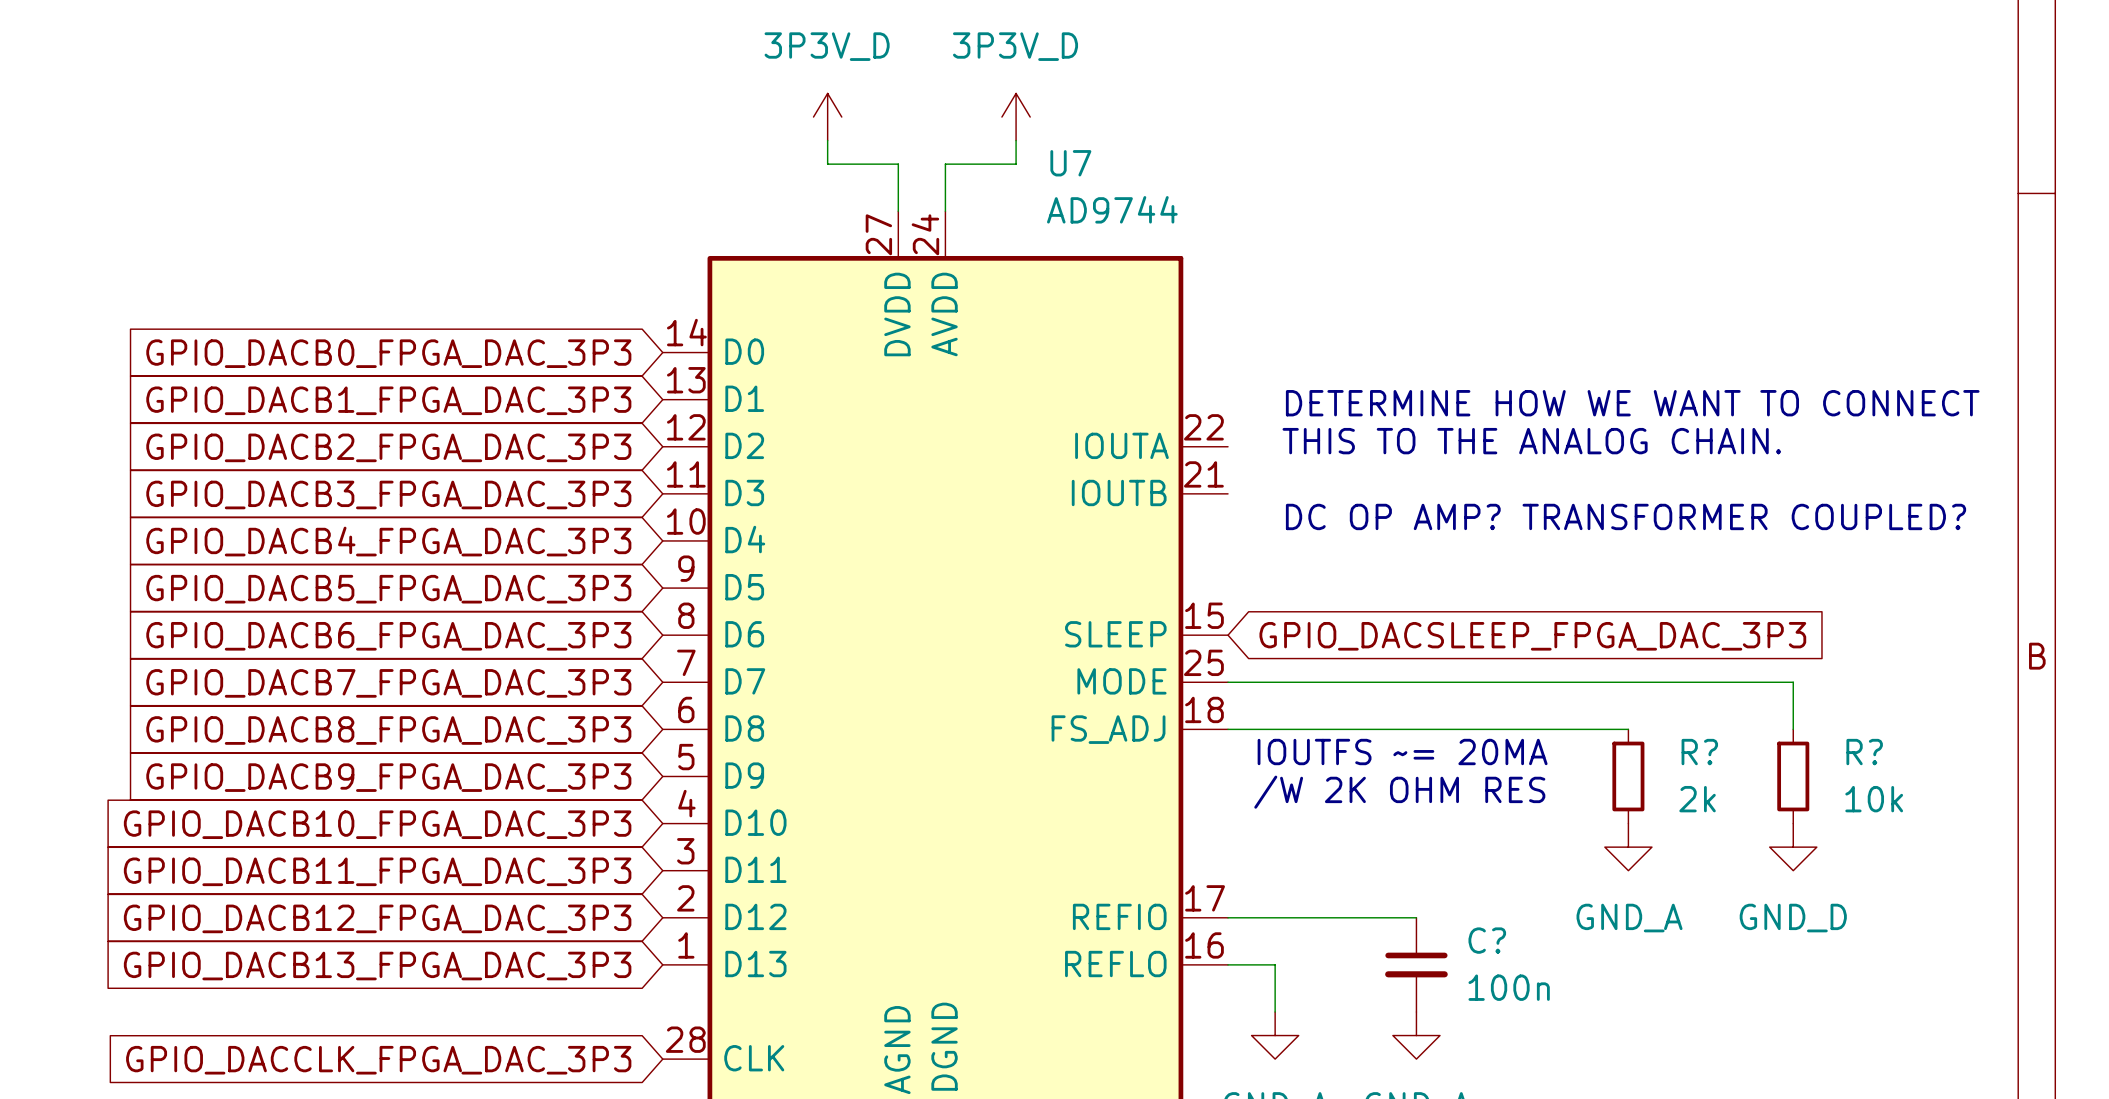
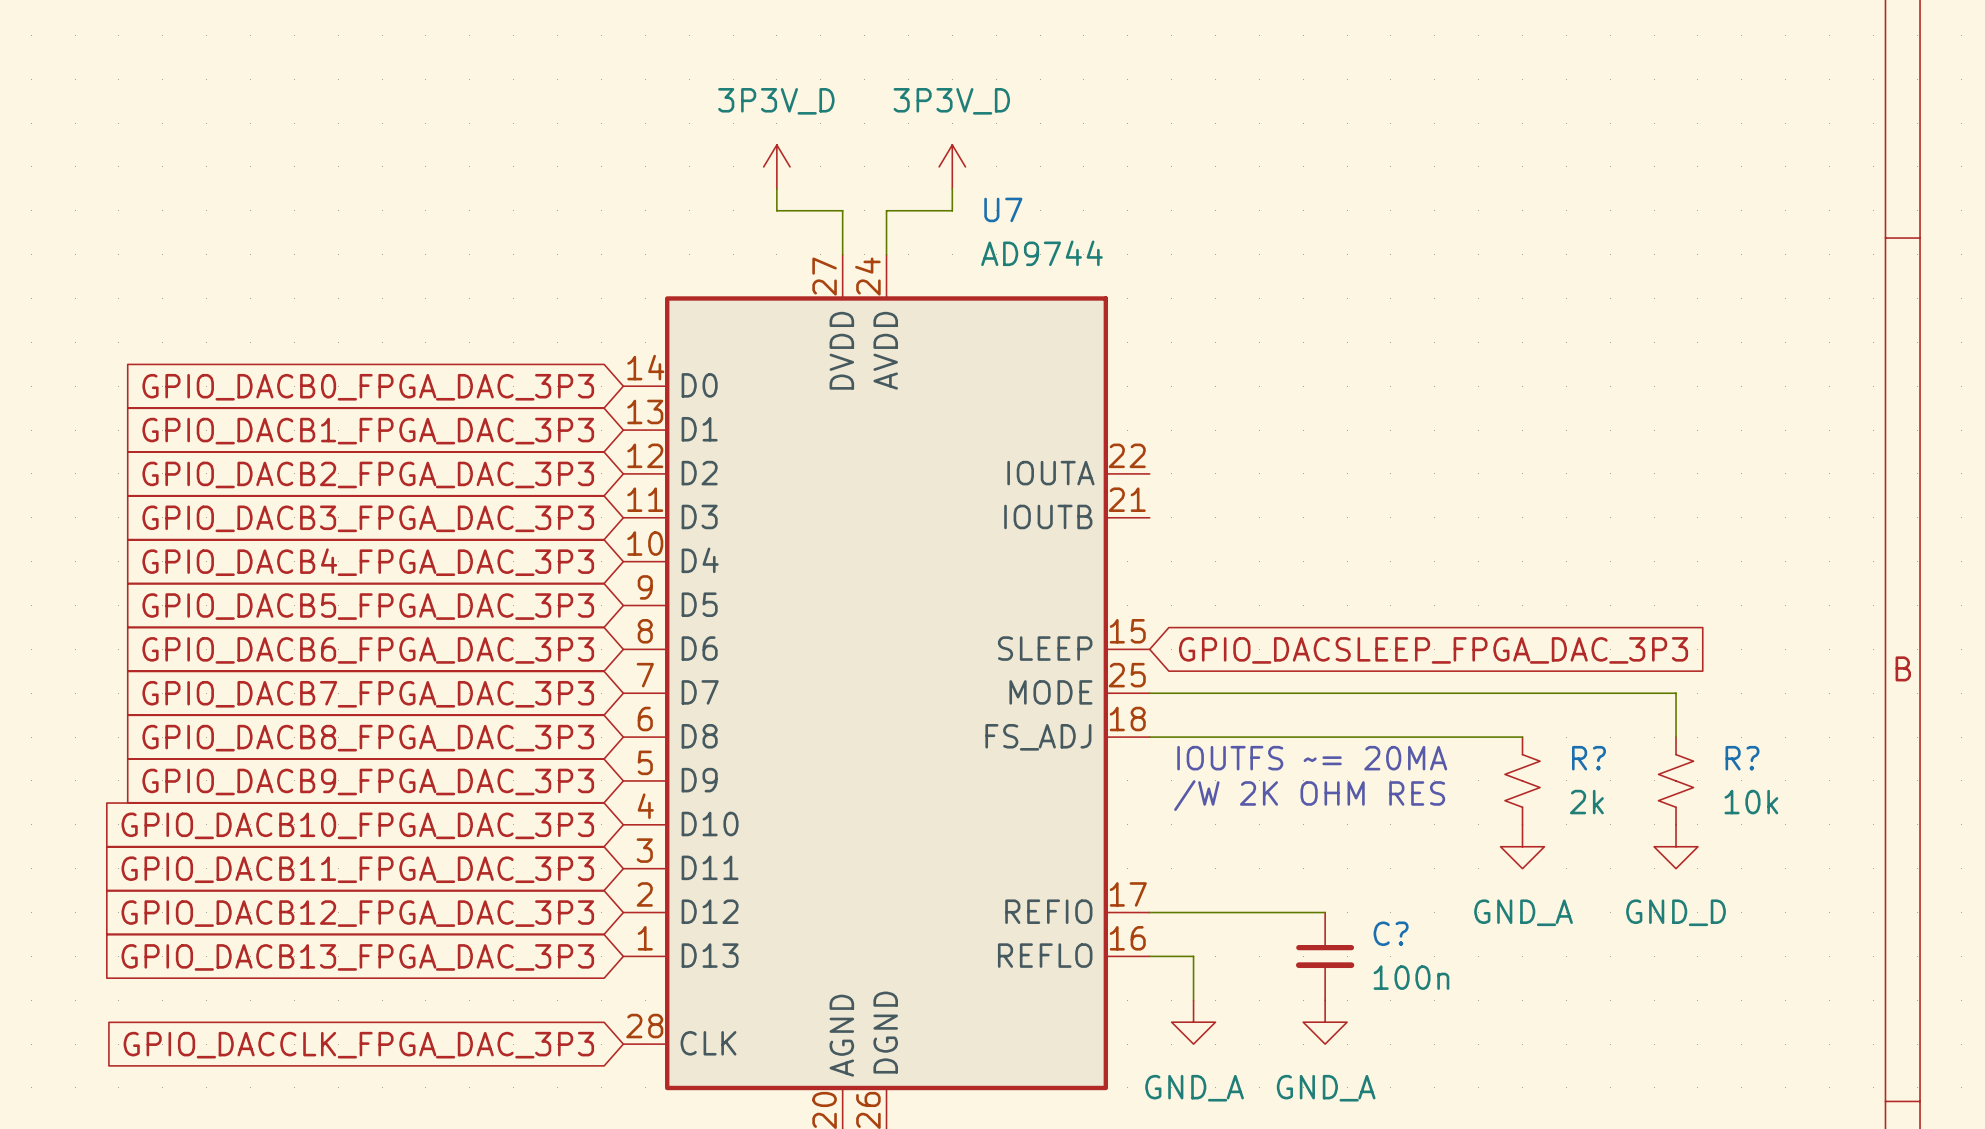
text: DETERMINE HOW WE WANT TO CONNECT (1632, 403) -> none
text: THIS TO THE ANALOG CHAIN. (1531, 441) -> none
text: DC OP AMP? TRANSFORMER COUPLED? (1626, 516) -> none
R? symbol: [1612, 729, 1645, 824] -> [1504, 737, 1541, 825]
R? symbol: [1777, 729, 1810, 824] -> [1658, 737, 1694, 825]

